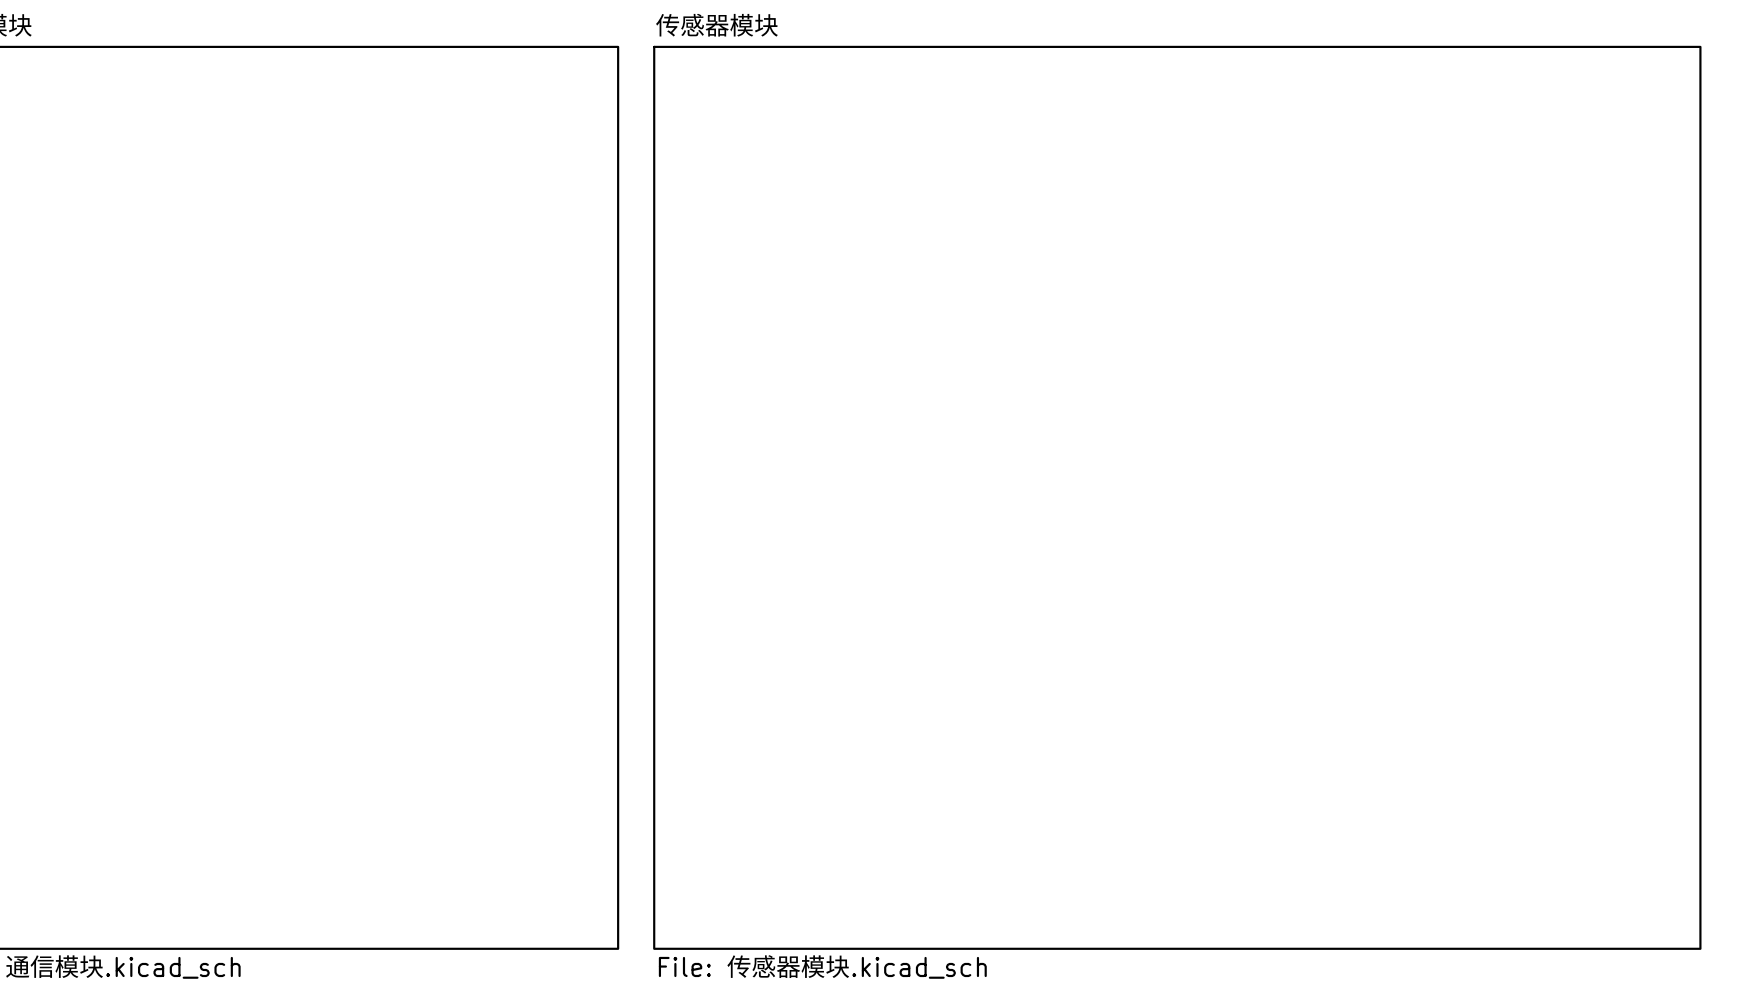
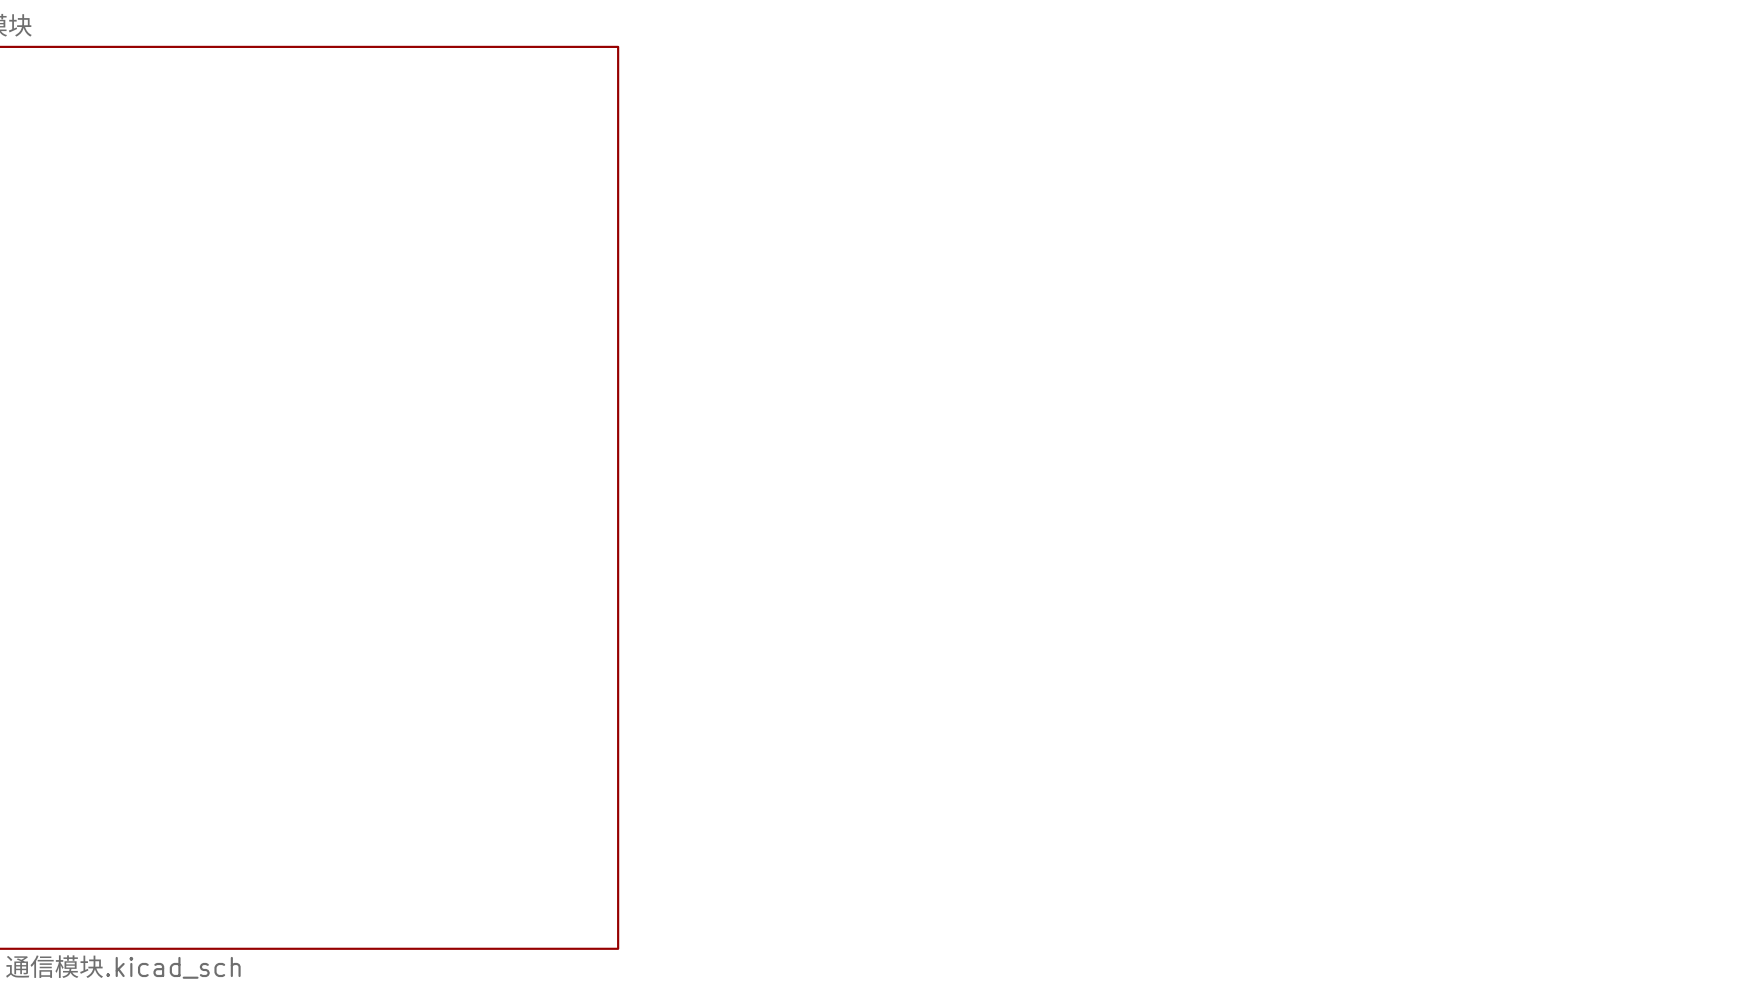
sheet 传感器模块: File: 传感器模块.kicad_sch (1177, 497) -> none

